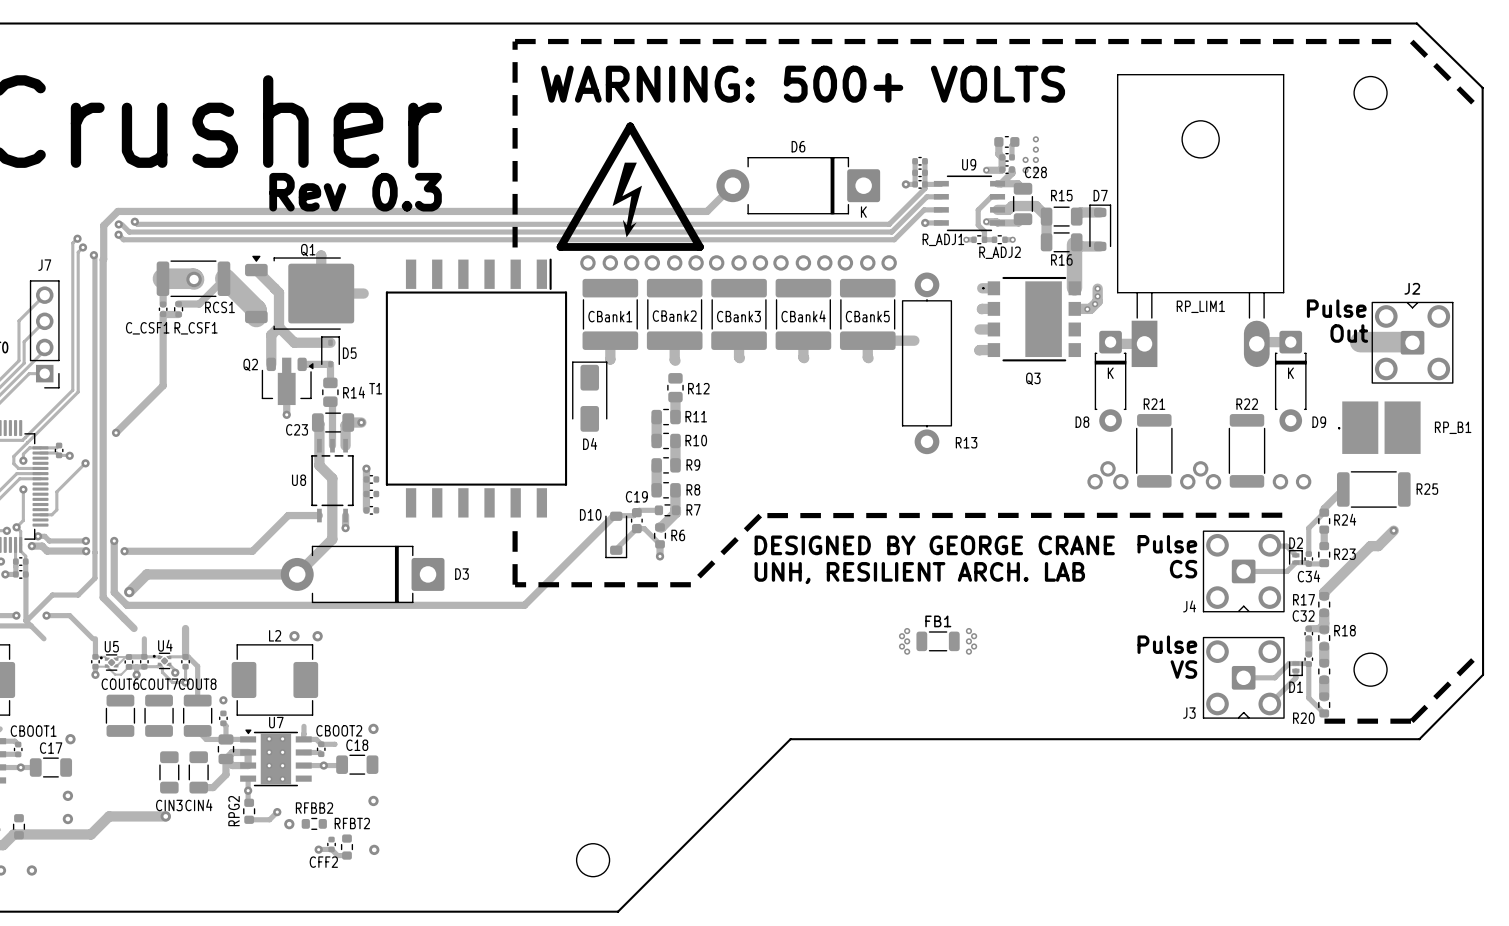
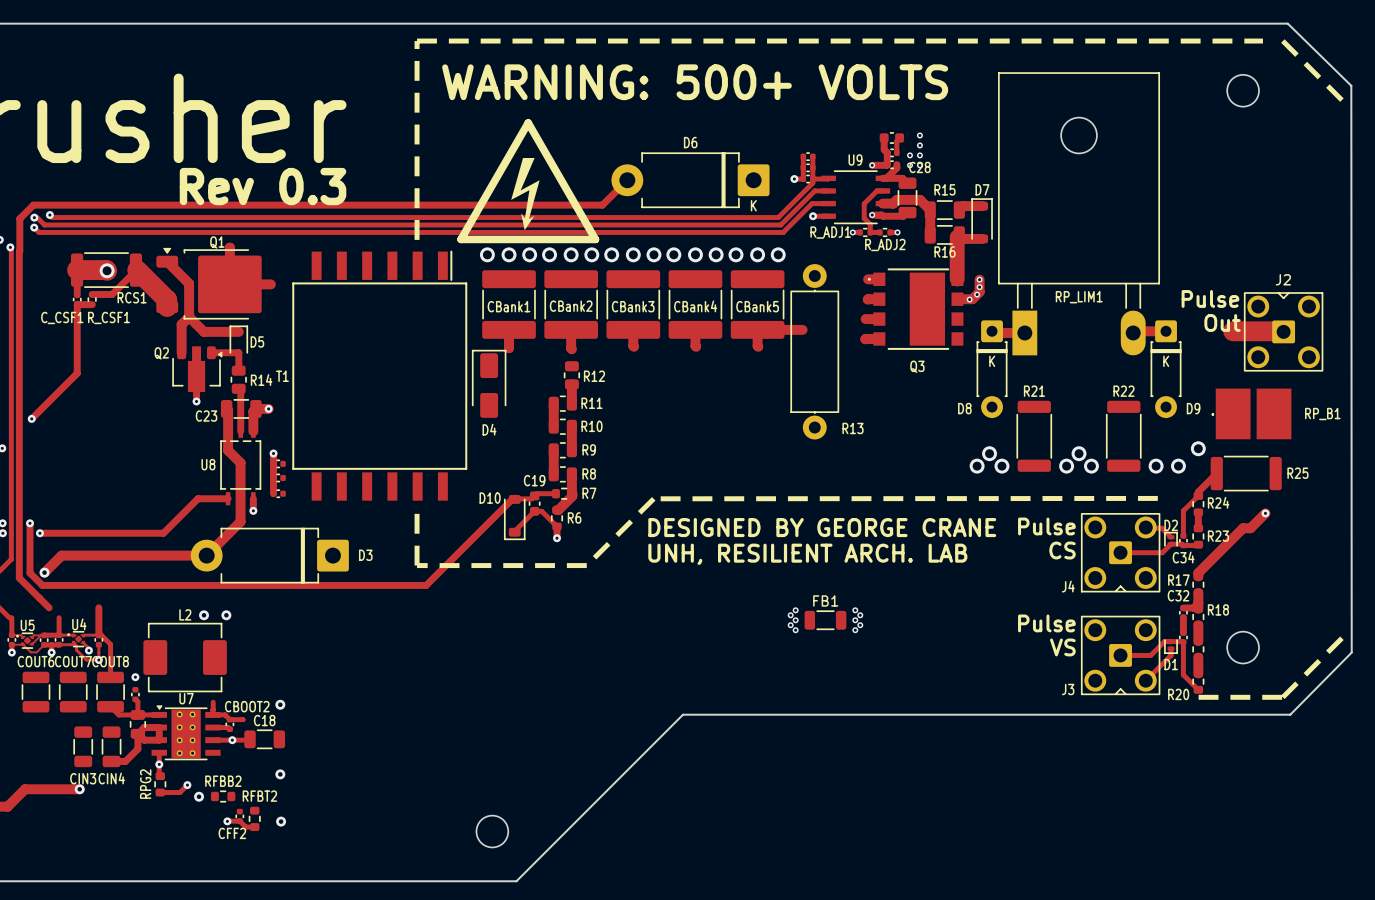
via: none -> (1198, 448)

